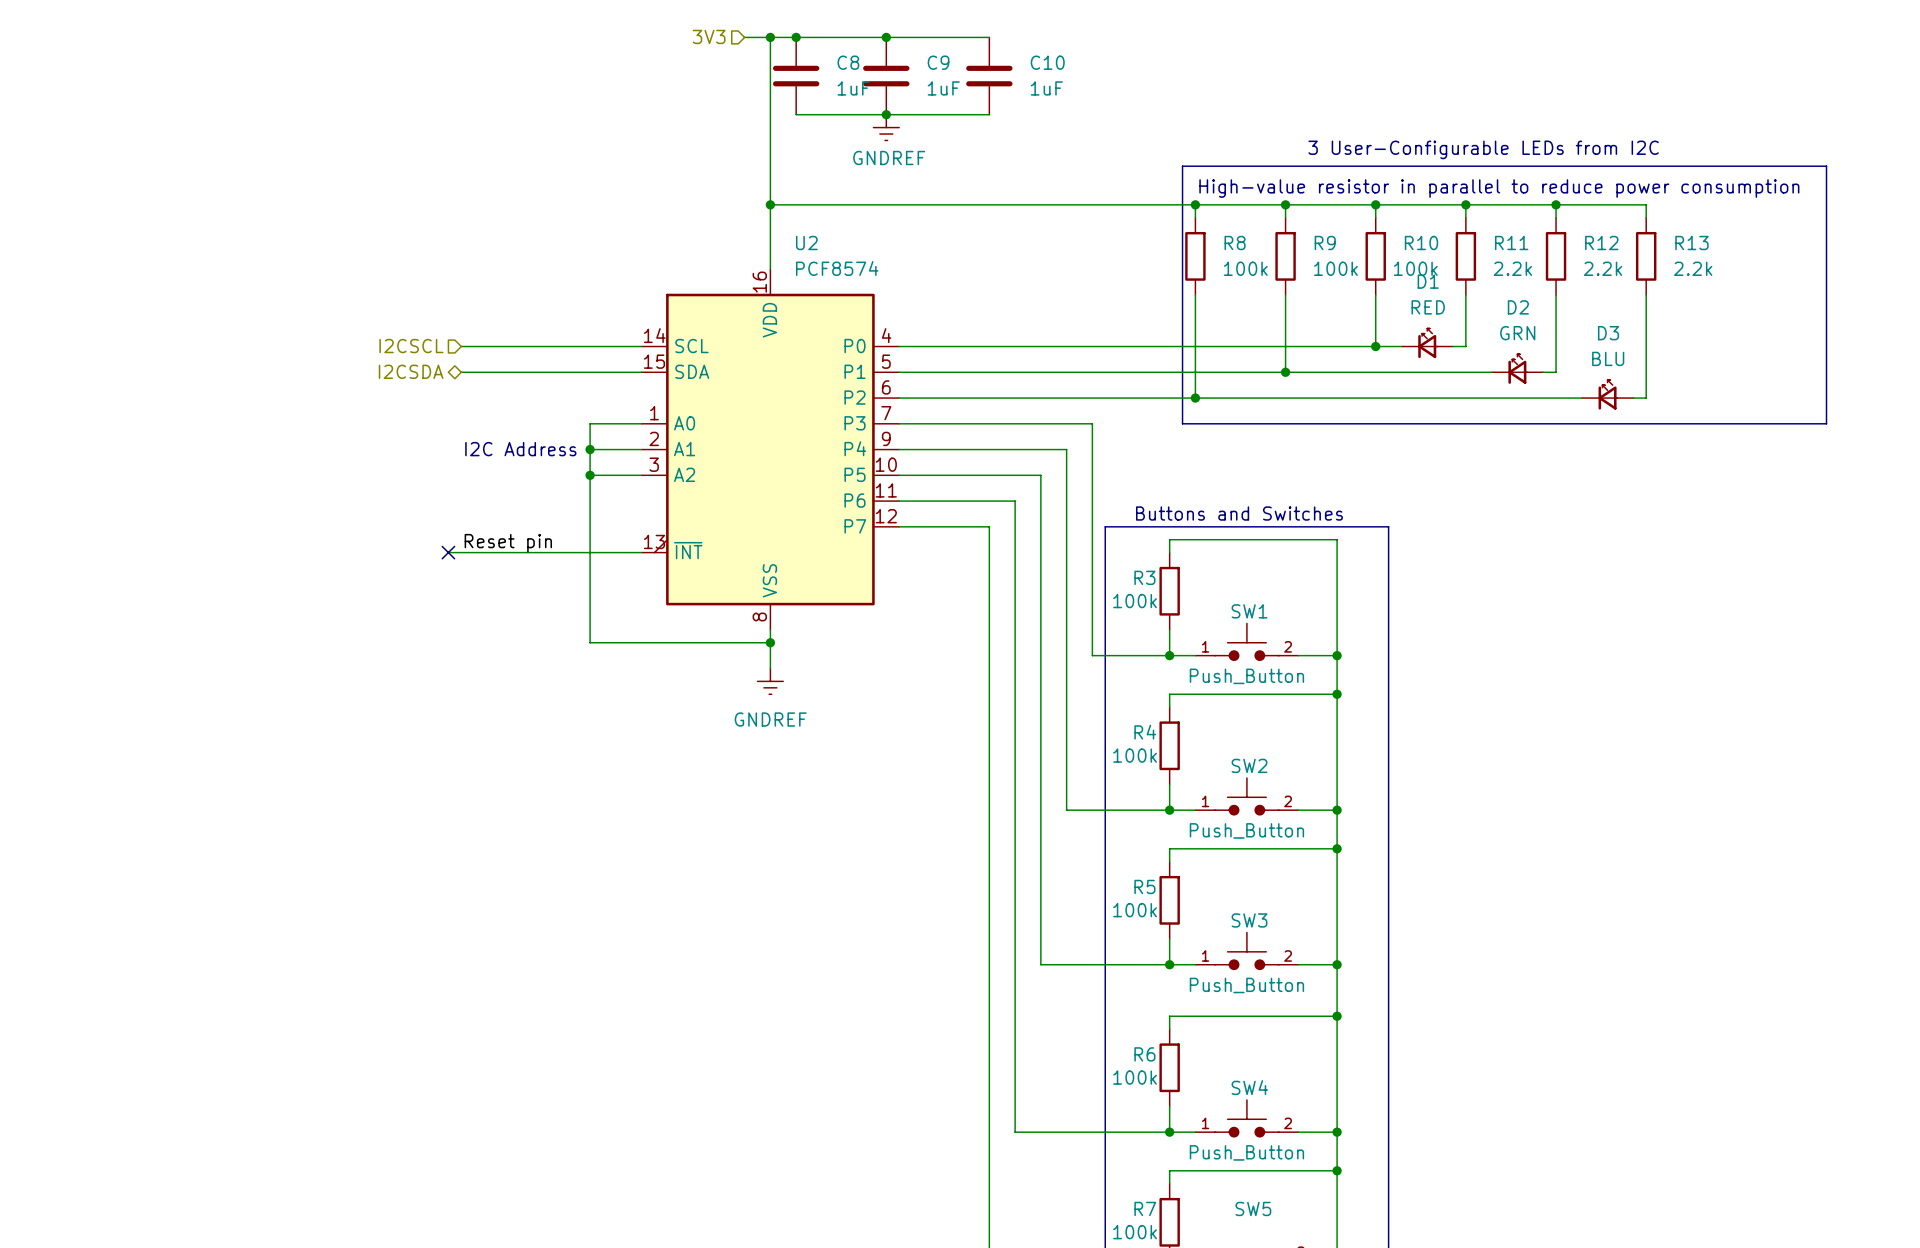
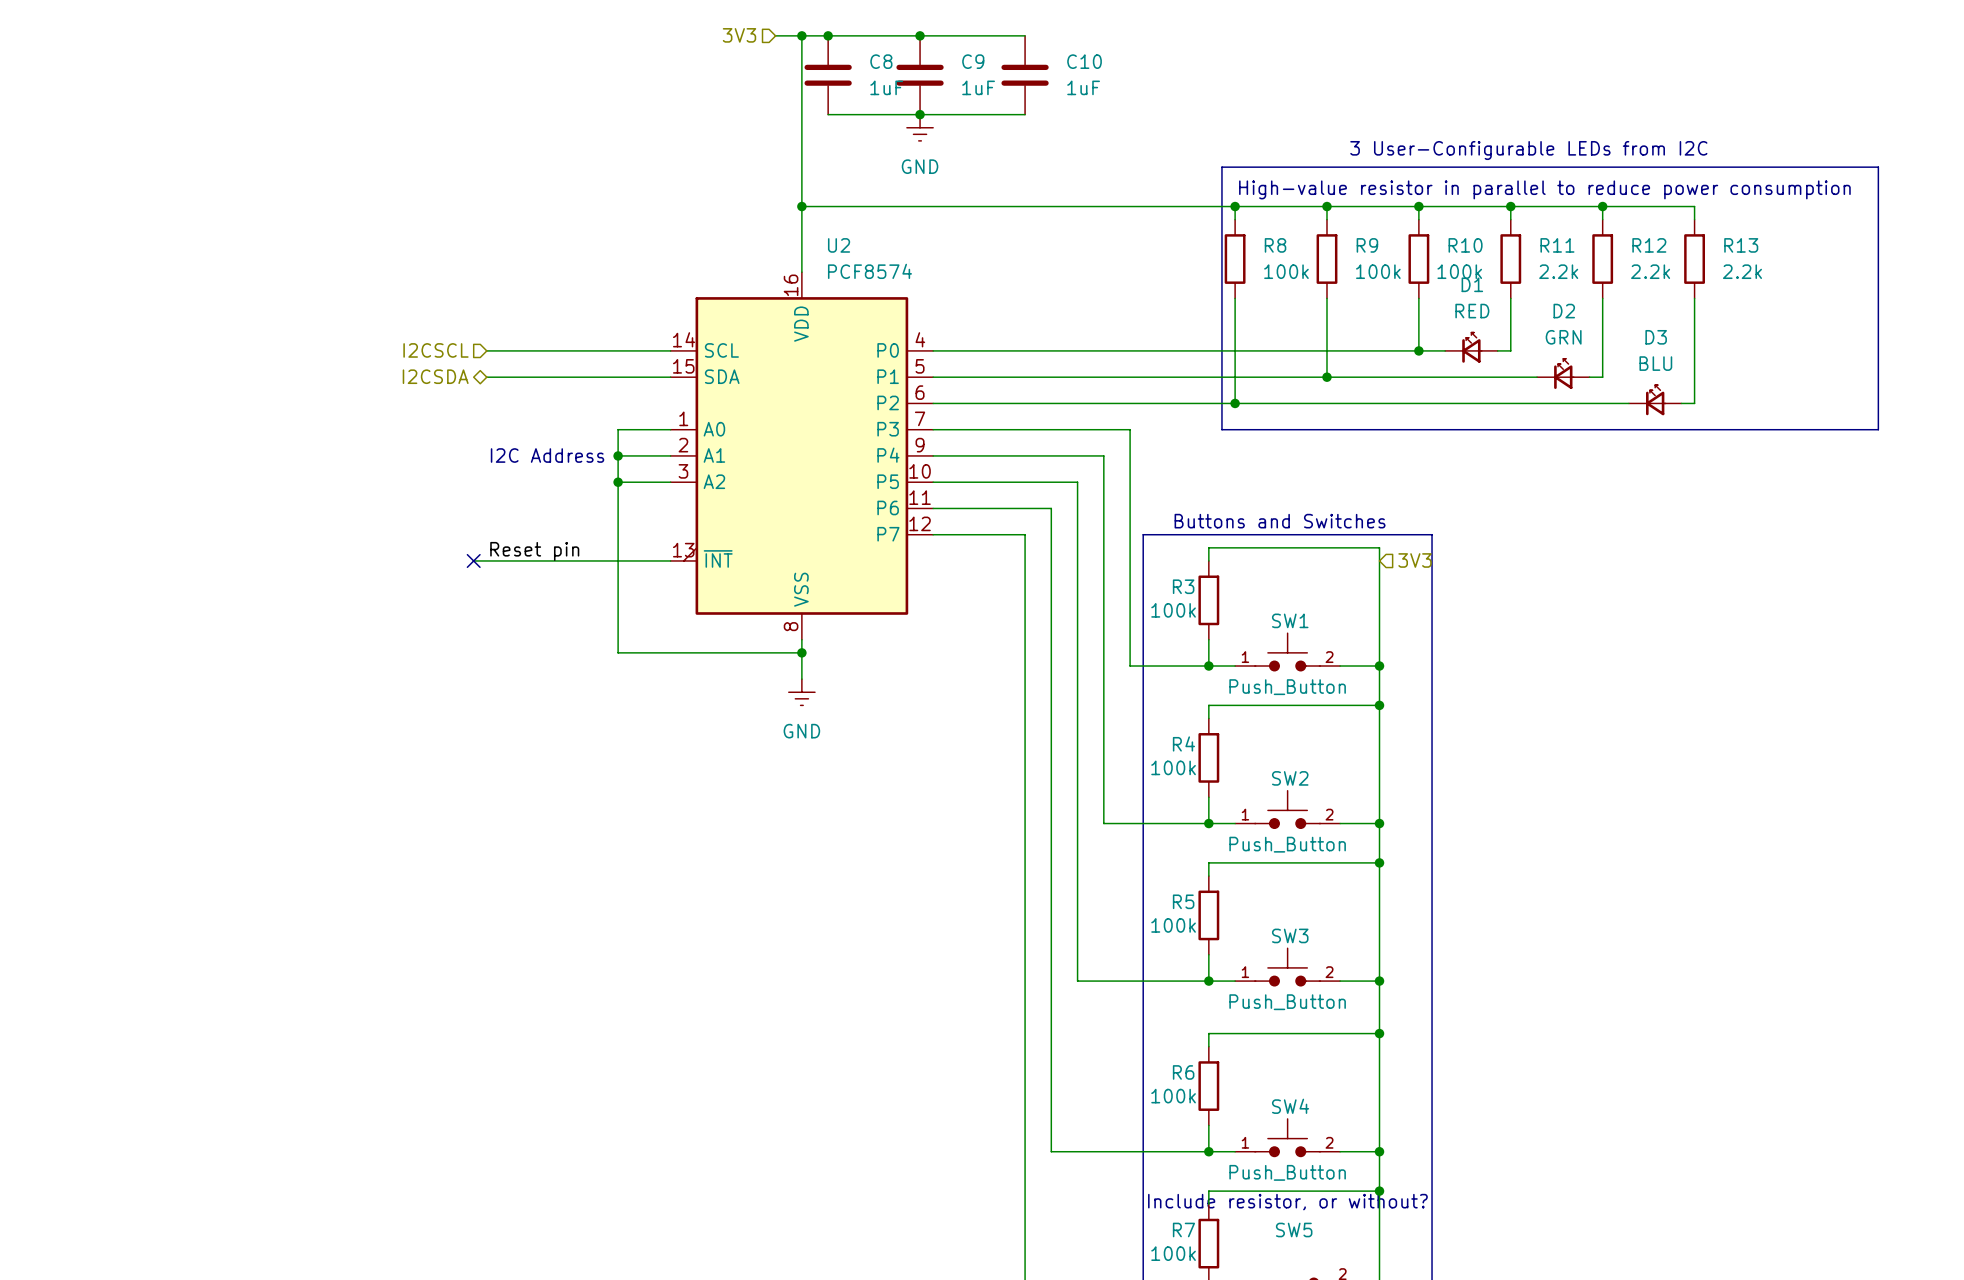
power symbol: GNDREF (886, 127) -> GND (920, 127)
hierarchical label: none -> 3V3 (1415, 560)
power symbol: GNDREF (770, 681) -> GND (801, 692)
text: none -> Include resistor, or without? (1287, 1202)

